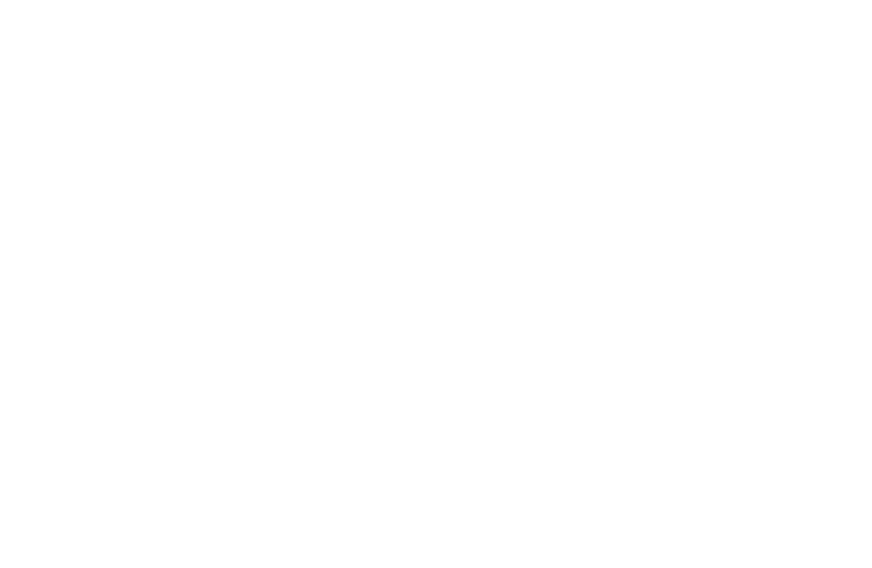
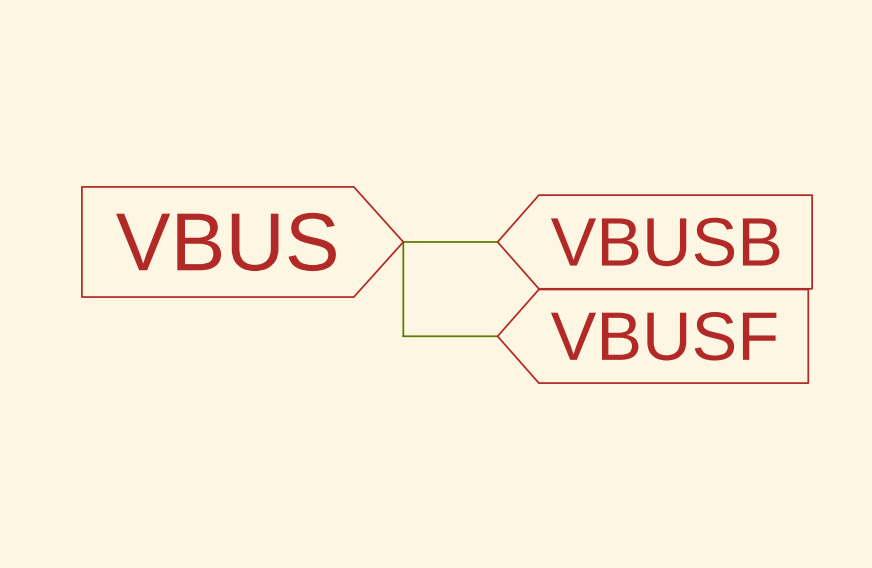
wire: none -> (497, 241) (403, 241) (403, 336) (497, 336)
global label: none -> VBUS (225, 241)
global label: none -> VBUSB (665, 241)
global label: none -> VBUSF (663, 336)

